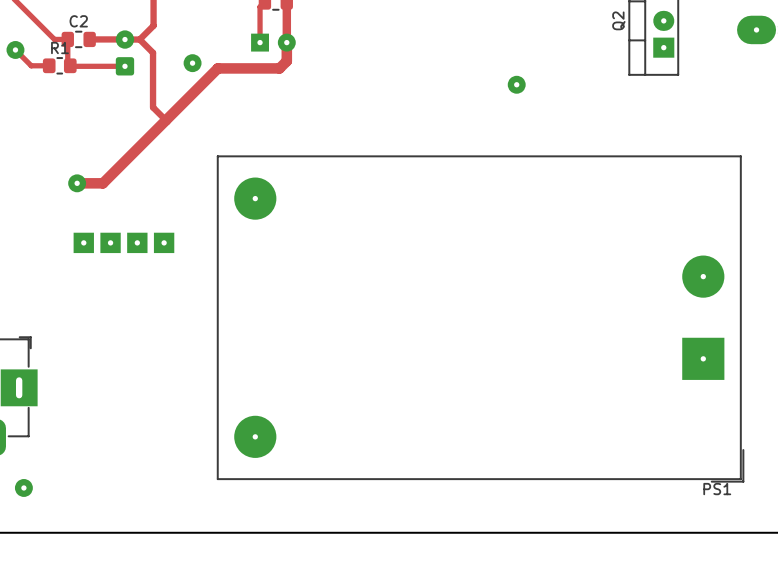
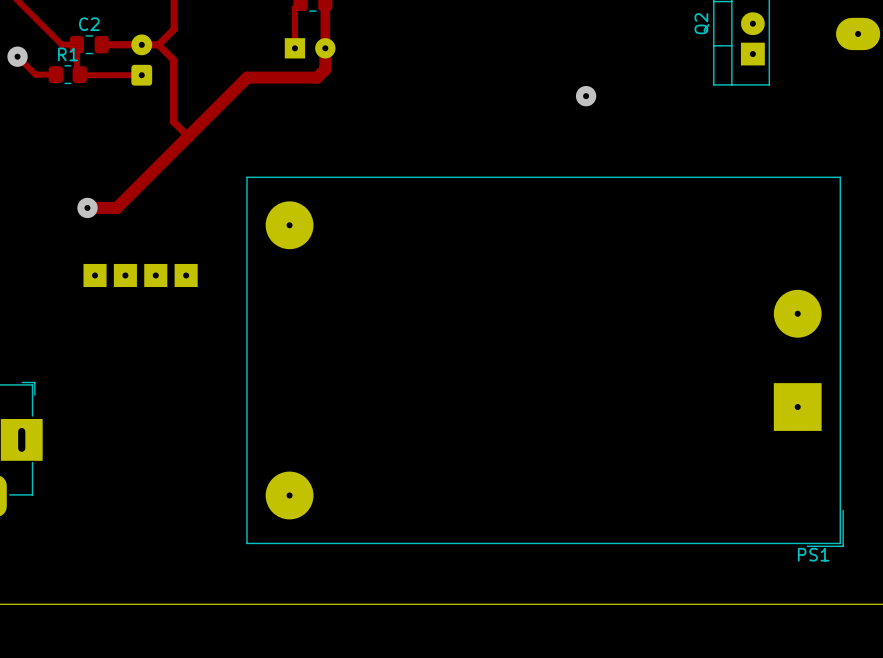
via: (192, 63) -> none
via: (23, 487) -> none

